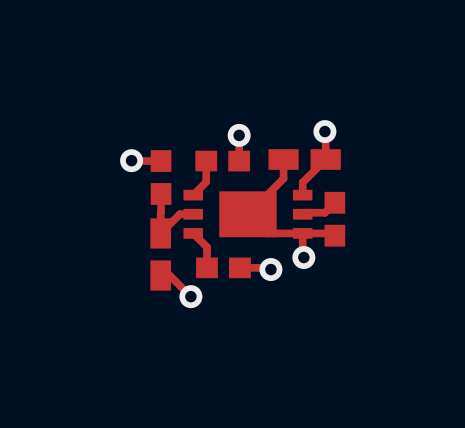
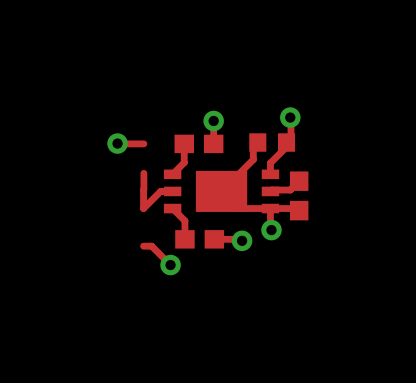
part footprint: [268, 149, 341, 170] -> [249, 133, 296, 152]
part: (161, 177) -> none
part: (160, 254) -> none

